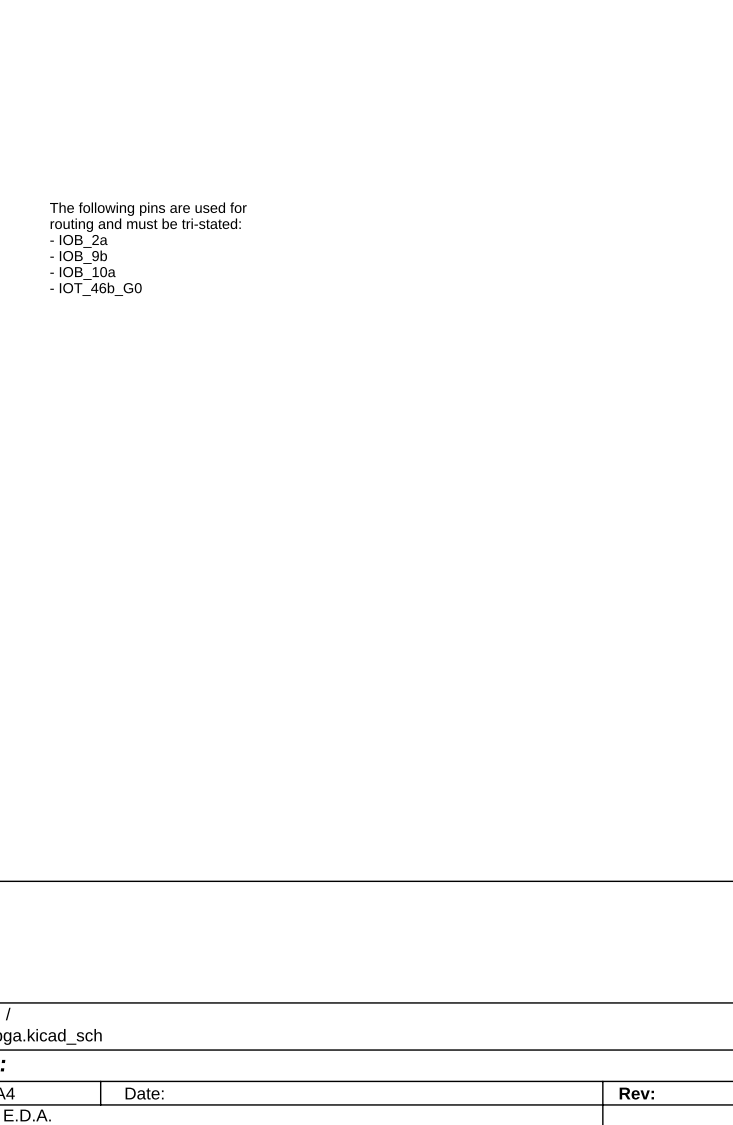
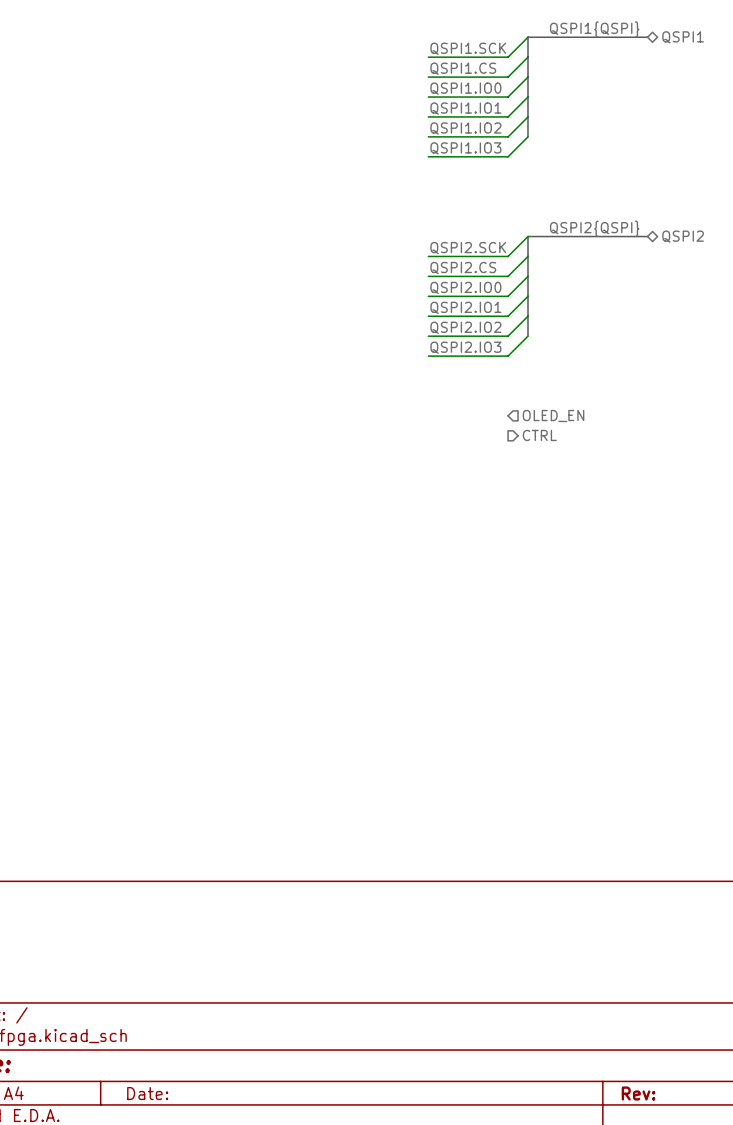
label: none -> QSPI1{QSPI} (594, 29)
wire: none -> (527, 37) (508, 57) (428, 57)
bus: none -> (647, 37) (527, 37) (527, 136)
hierarchical label: none -> QSPI1 (683, 37)
label: none -> QSPI1.SCK (468, 48)
wire: none -> (527, 57) (508, 77) (428, 77)
label: none -> QSPI1.CS (463, 68)
wire: none -> (527, 77) (508, 97) (428, 97)
label: none -> QSPI1.IO0 (465, 88)
wire: none -> (527, 97) (508, 116) (428, 116)
label: none -> QSPI1.IO1 (465, 108)
wire: none -> (527, 116) (508, 136) (428, 136)
label: none -> QSPI1.IO2 (465, 128)
wire: none -> (527, 136) (508, 156) (428, 156)
label: none -> QSPI1.IO3 (465, 148)
text: The following pins are used for (148, 209) -> none
text: routing and must be tri-stated: (145, 225) -> none
label: none -> QSPI2{QSPI} (594, 228)
wire: none -> (527, 236) (508, 256) (428, 256)
bus: none -> (647, 236) (527, 236) (527, 336)
hierarchical label: none -> QSPI2 (683, 236)
text: - IOB_2a (78, 241) -> none
label: none -> QSPI2.SCK (468, 248)
wire: none -> (527, 256) (508, 276) (428, 276)
text: - IOB_9b (78, 257) -> none
label: none -> QSPI2.CS (463, 267)
text: - IOB_10a (83, 273) -> none
wire: none -> (527, 276) (508, 296) (428, 296)
label: none -> QSPI2.IO0 (465, 287)
text: - IOT_46b_G0 (96, 289) -> none
wire: none -> (527, 296) (508, 316) (428, 316)
label: none -> QSPI2.IO1 (465, 307)
wire: none -> (527, 316) (508, 336) (428, 336)
label: none -> QSPI2.IO2 (465, 327)
wire: none -> (527, 336) (508, 356) (428, 356)
label: none -> QSPI2.IO3 (465, 347)
hierarchical label: none -> OLED_EN (553, 416)
hierarchical label: none -> CTRL (539, 435)

